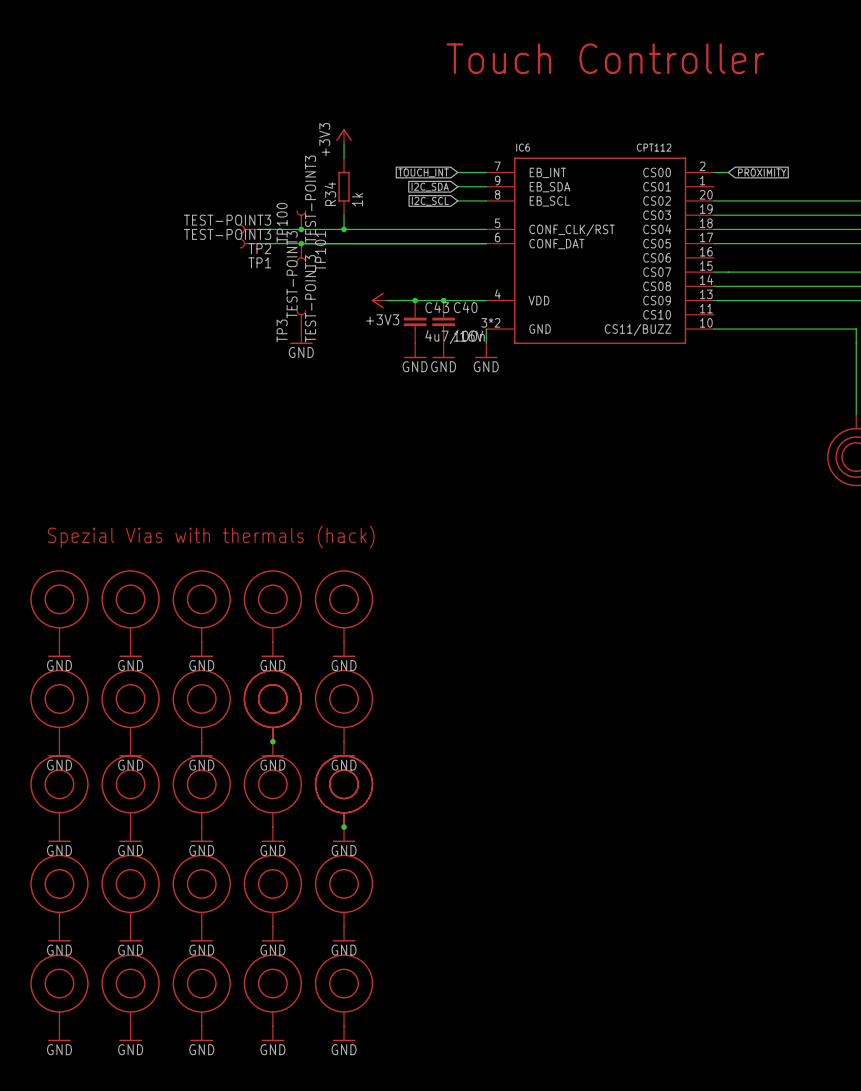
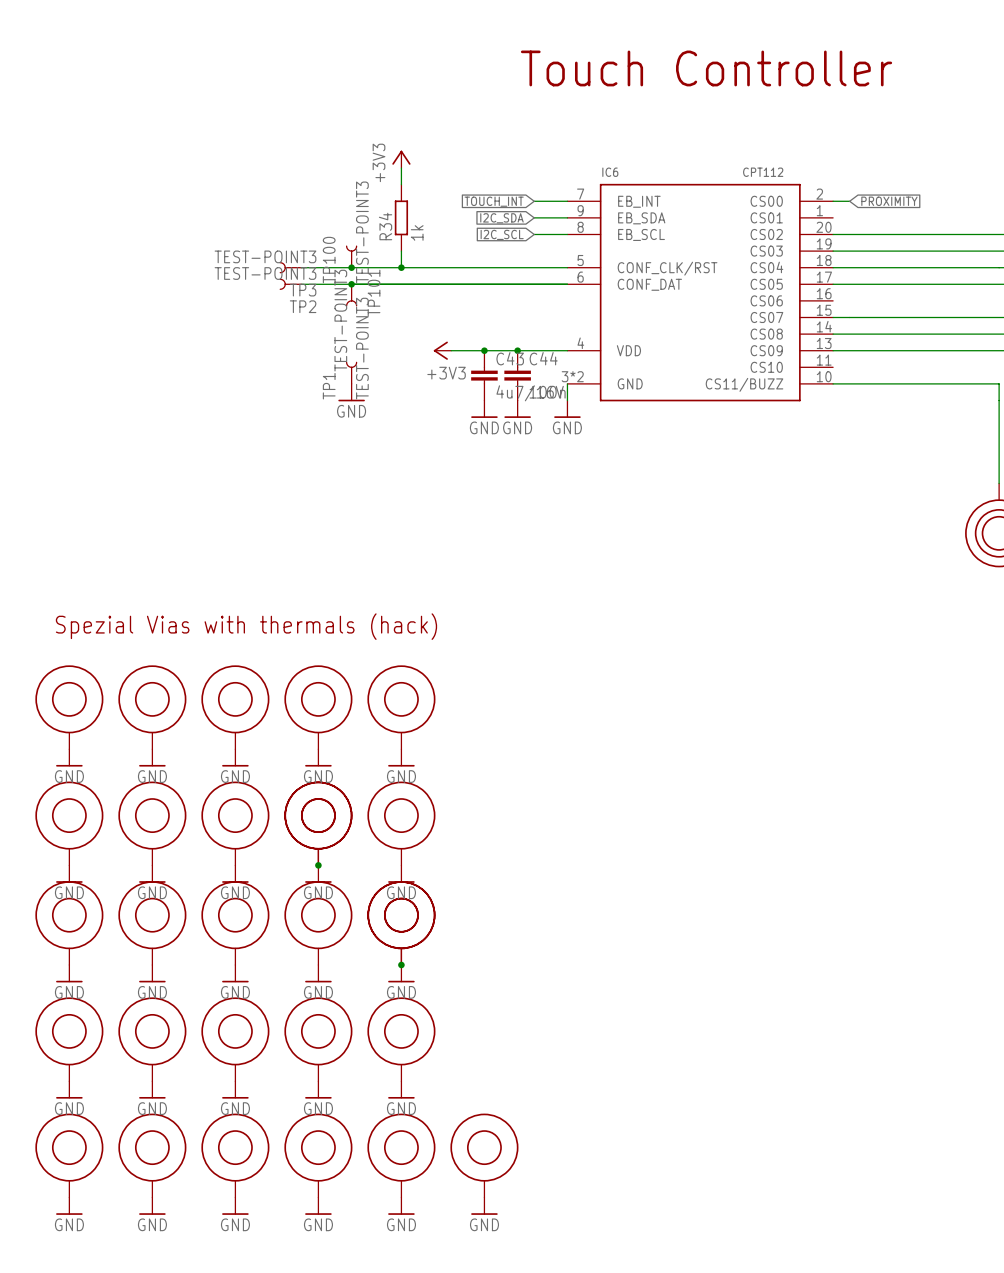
TP2 name: TP2 (259, 248) -> TP3 (303, 290)
TP1 name: TP1 (259, 262) -> TP2 (303, 306)
C40 name: C40 (465, 307) -> C44 (543, 358)
TP3 name: TP3 (282, 330) -> TP1 (329, 386)
part: none -> (484, 1155)
power symbol: none -> GND (484, 1206)

